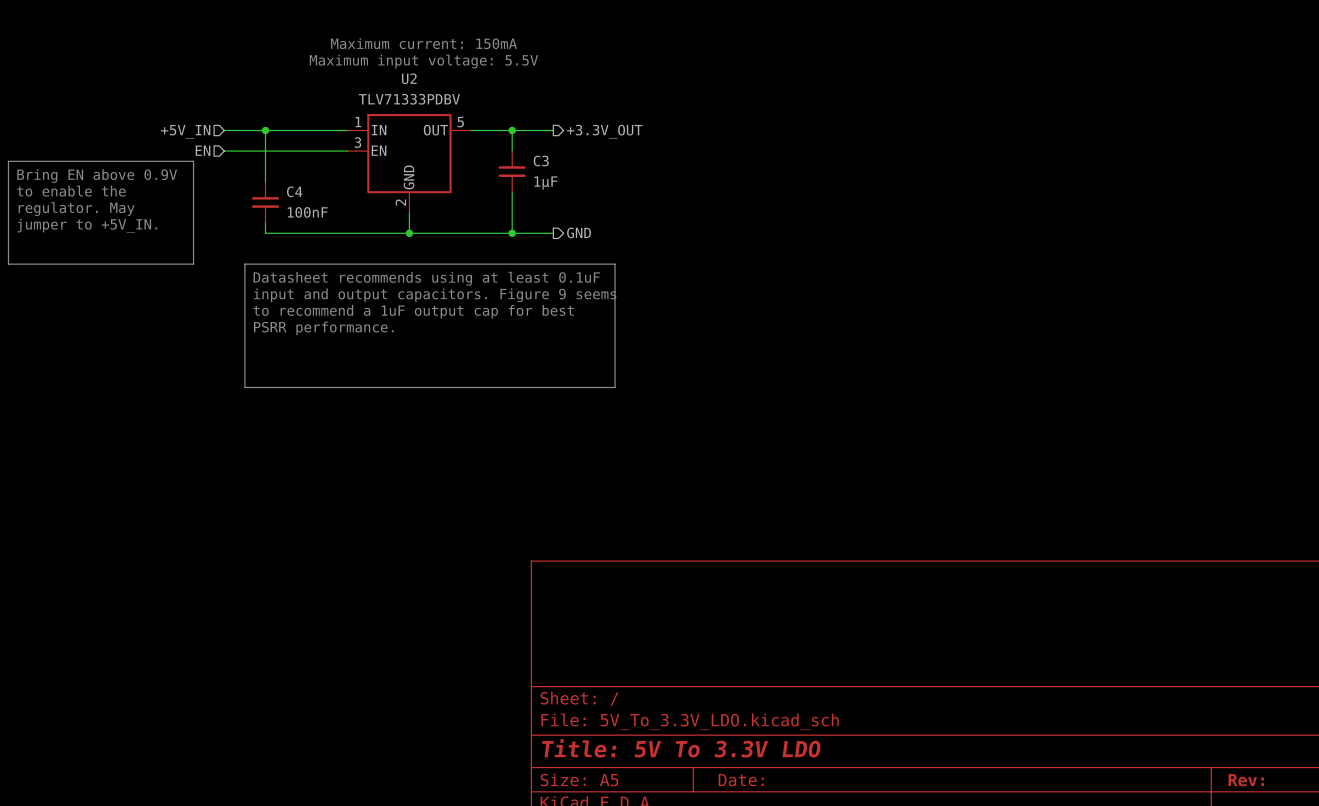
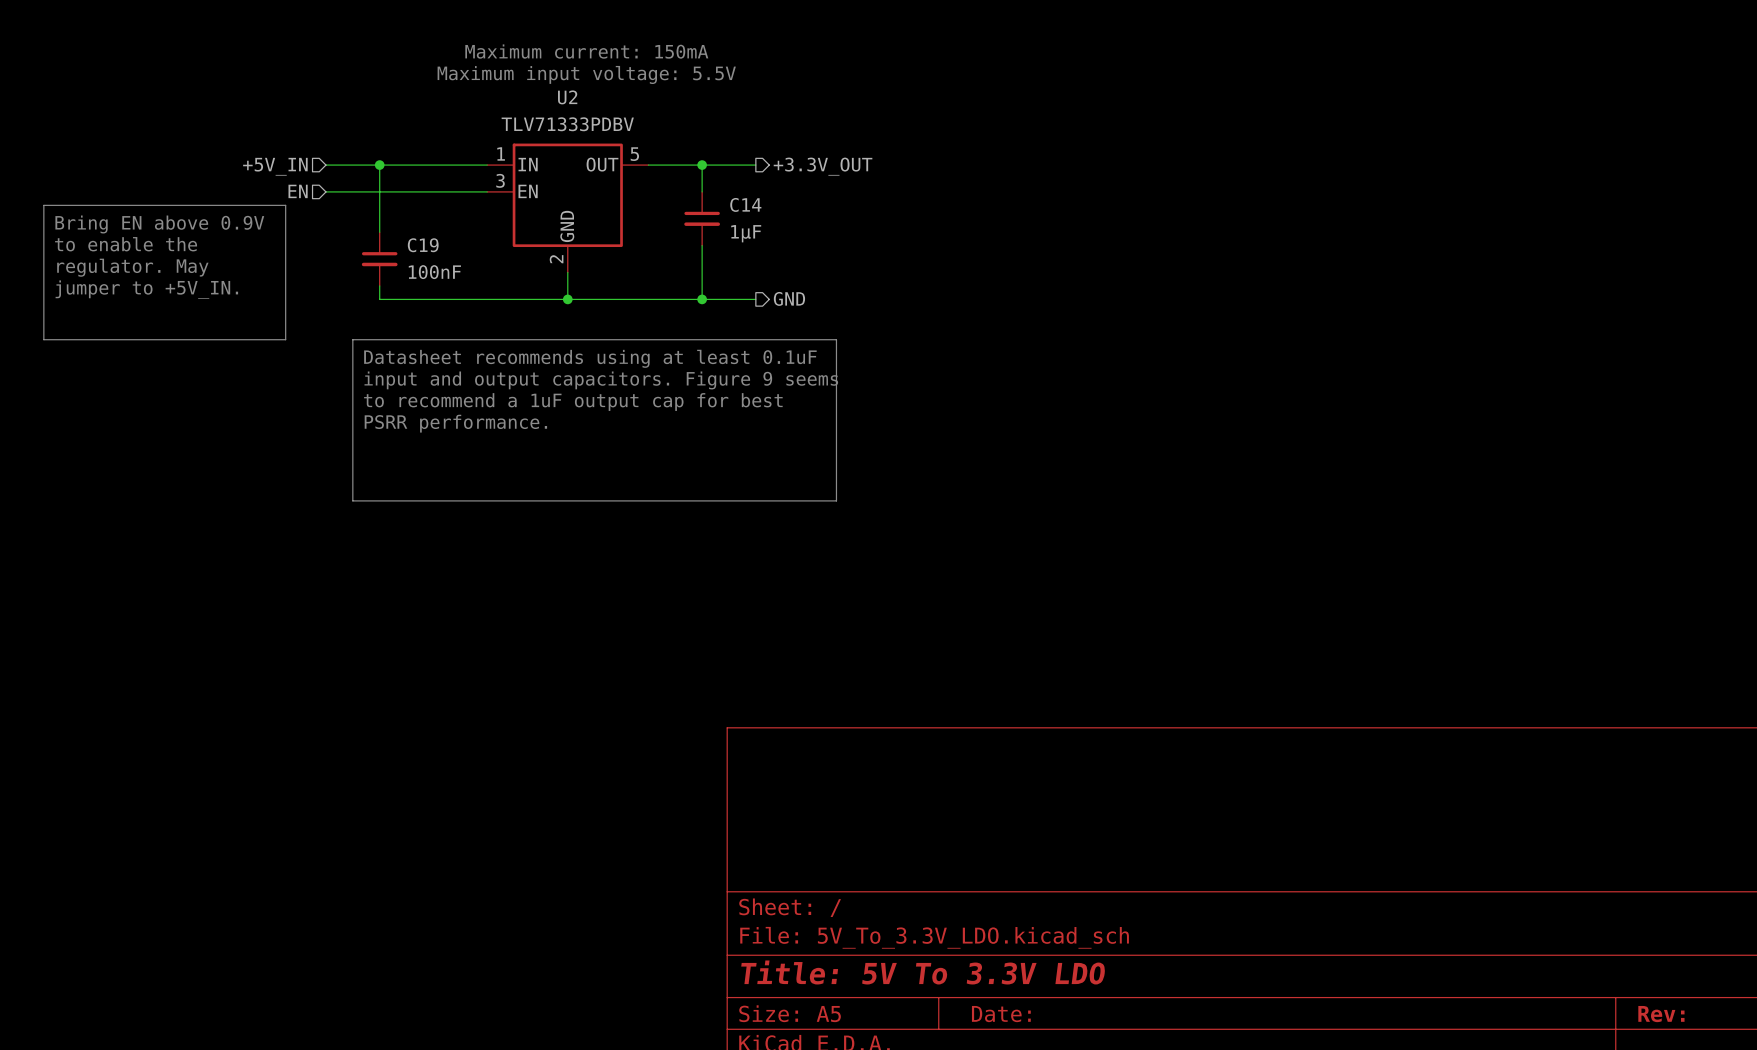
C3: 1µF (512, 171) -> none
C14: none -> 1µF (702, 218)
C4: 100nF (265, 202) -> none
C19: none -> 100nF (379, 259)

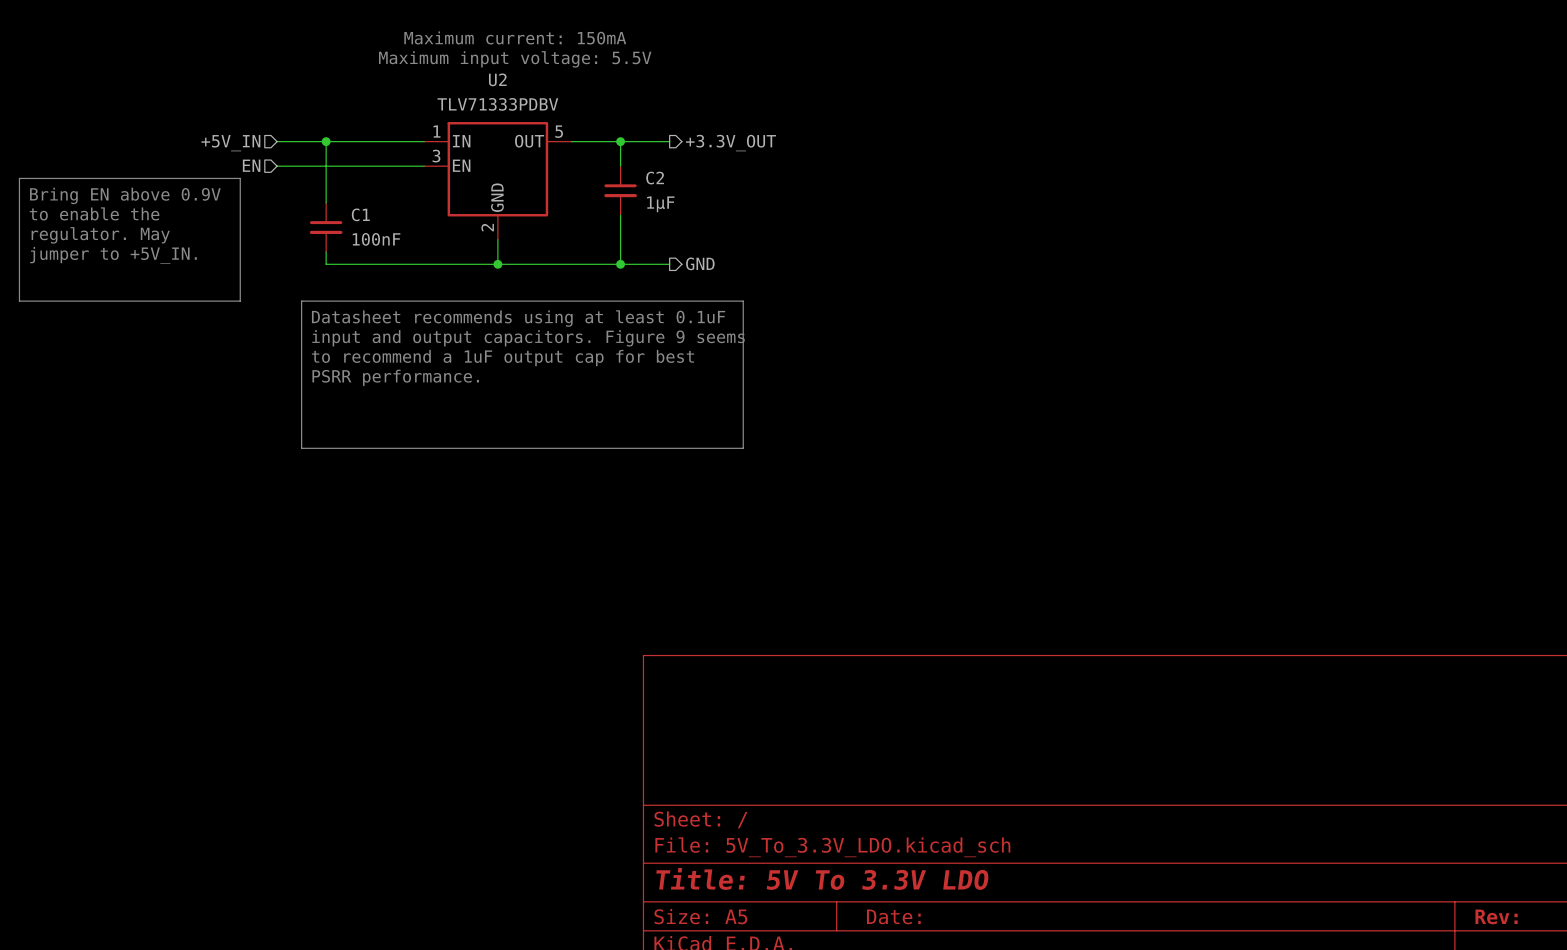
C14 name: C14 (745, 204) -> C2 (655, 178)
C19 name: C19 (423, 245) -> C1 (360, 214)

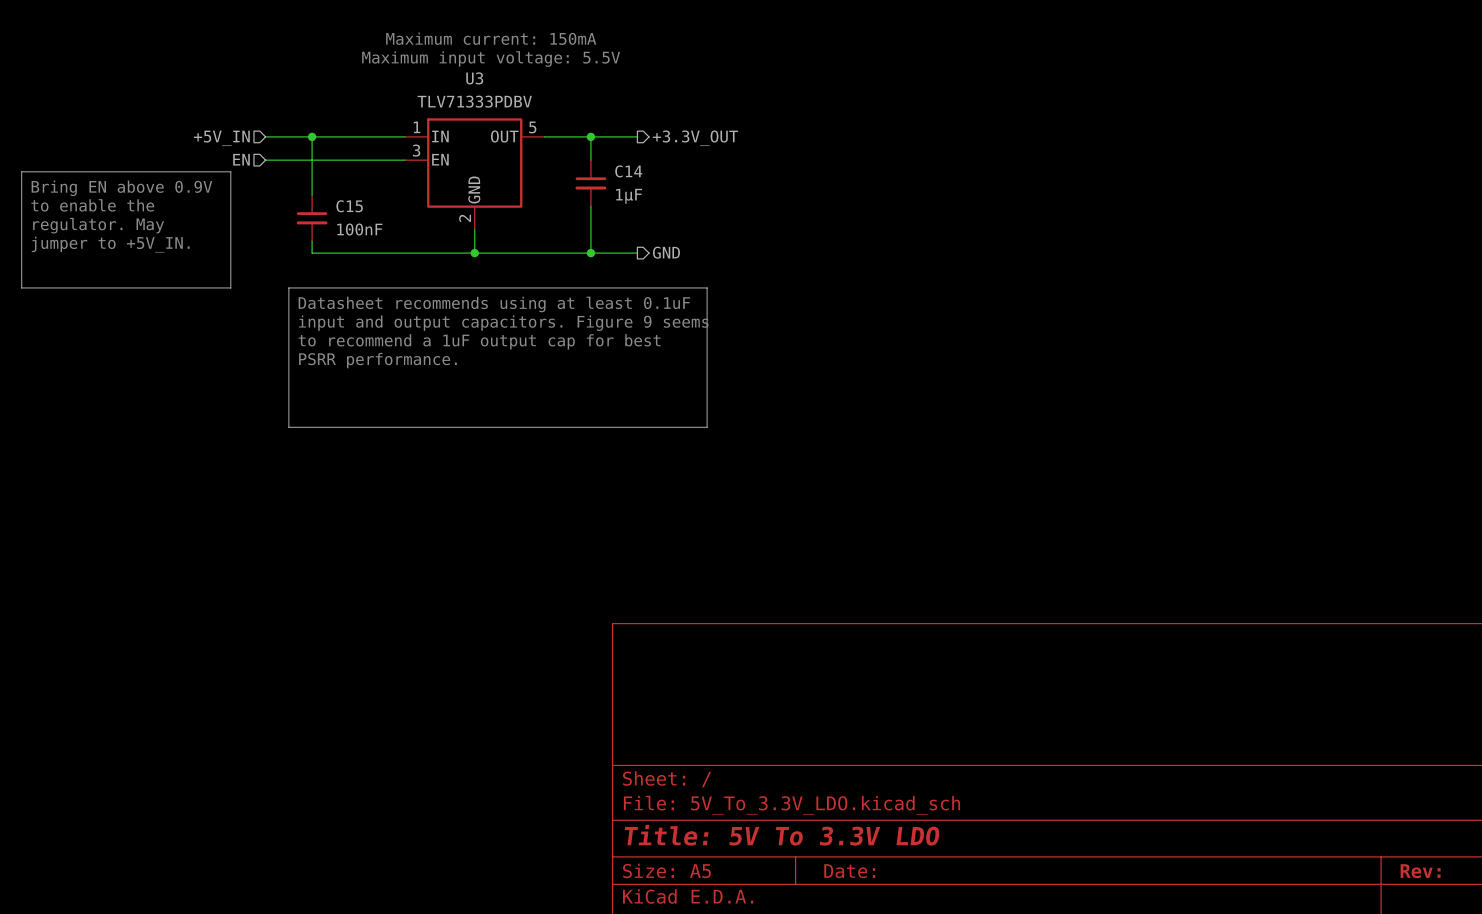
U2 name: U2 (497, 79) -> U3 (474, 78)
C2 name: C2 (655, 178) -> C14 (628, 171)
C1 name: C1 (360, 214) -> C15 (349, 206)

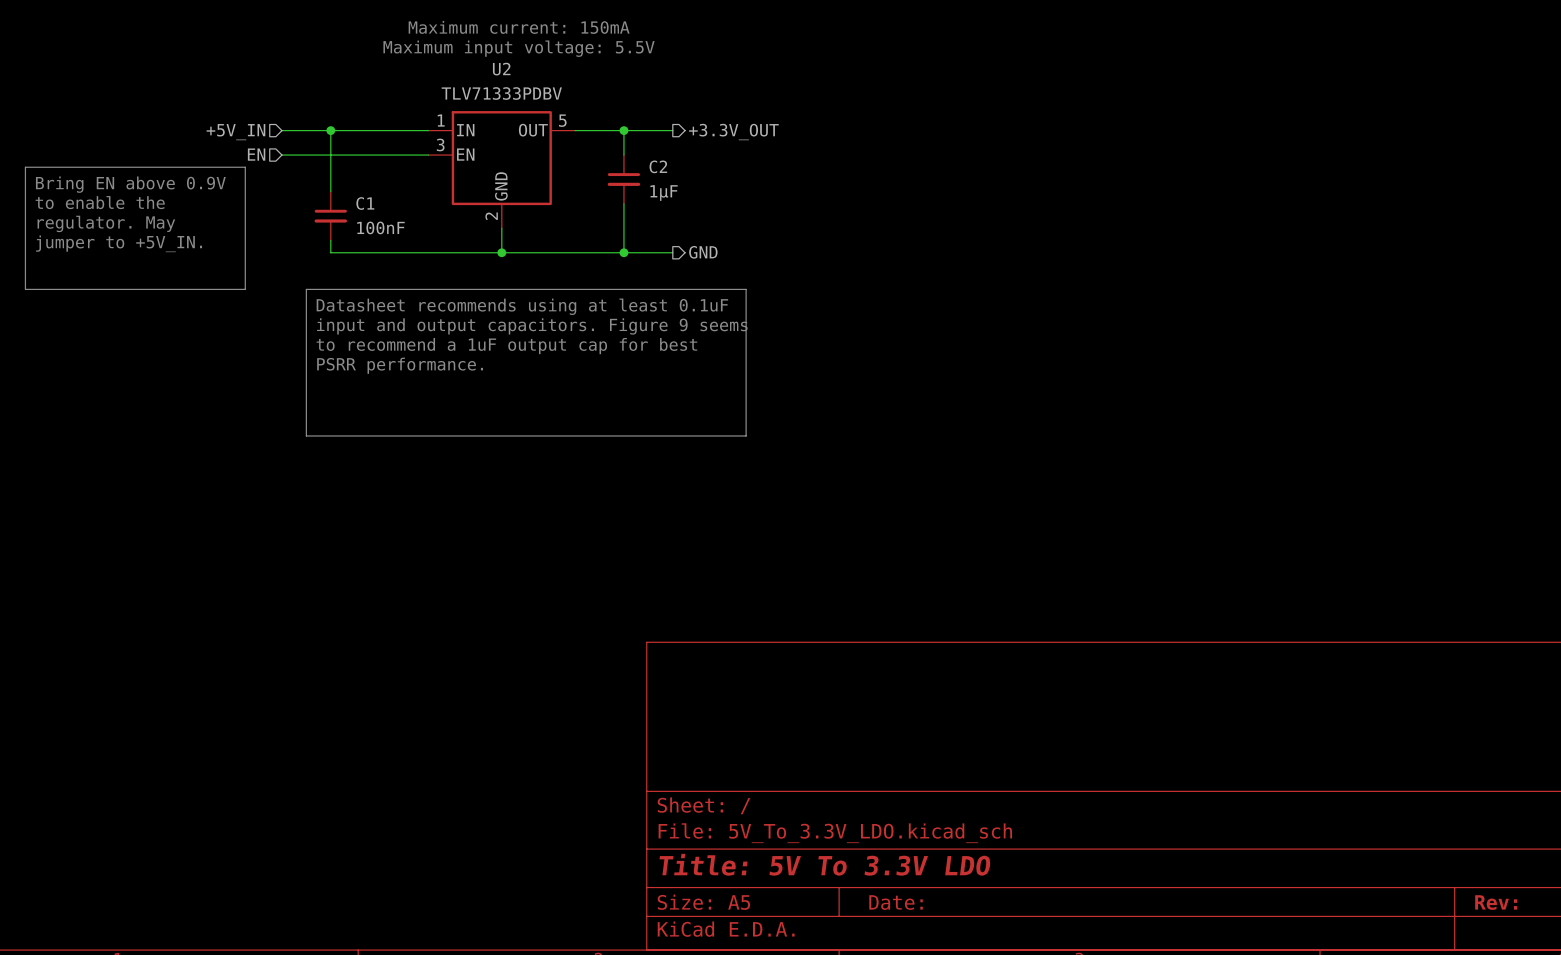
U3 name: U3 (474, 78) -> U2 (501, 69)
C14 name: C14 (628, 171) -> C2 (658, 166)
C15 name: C15 (349, 206) -> C1 (365, 203)

